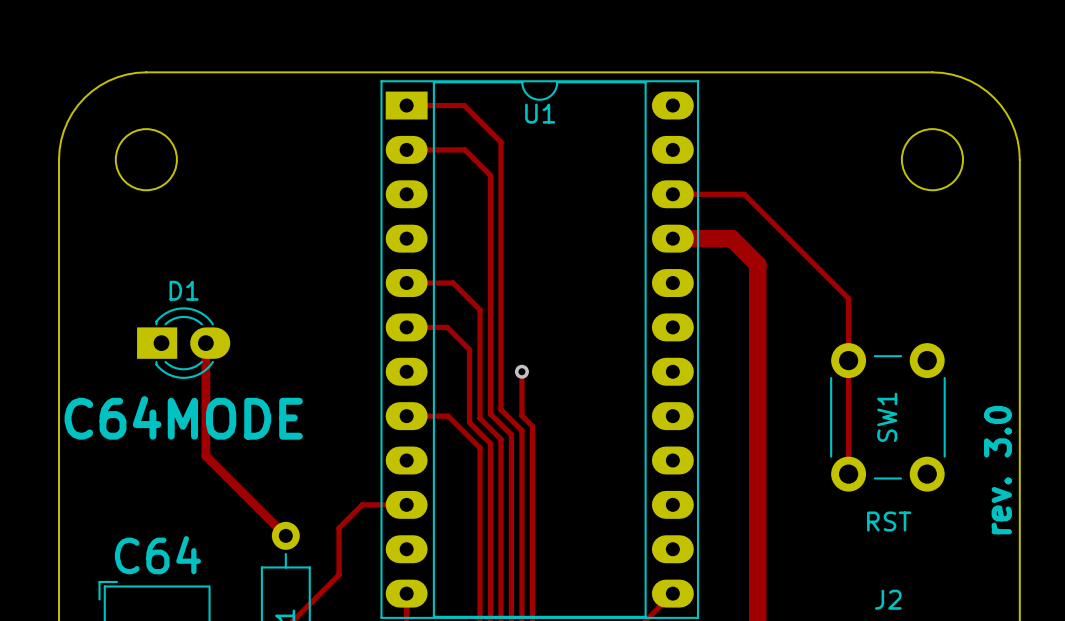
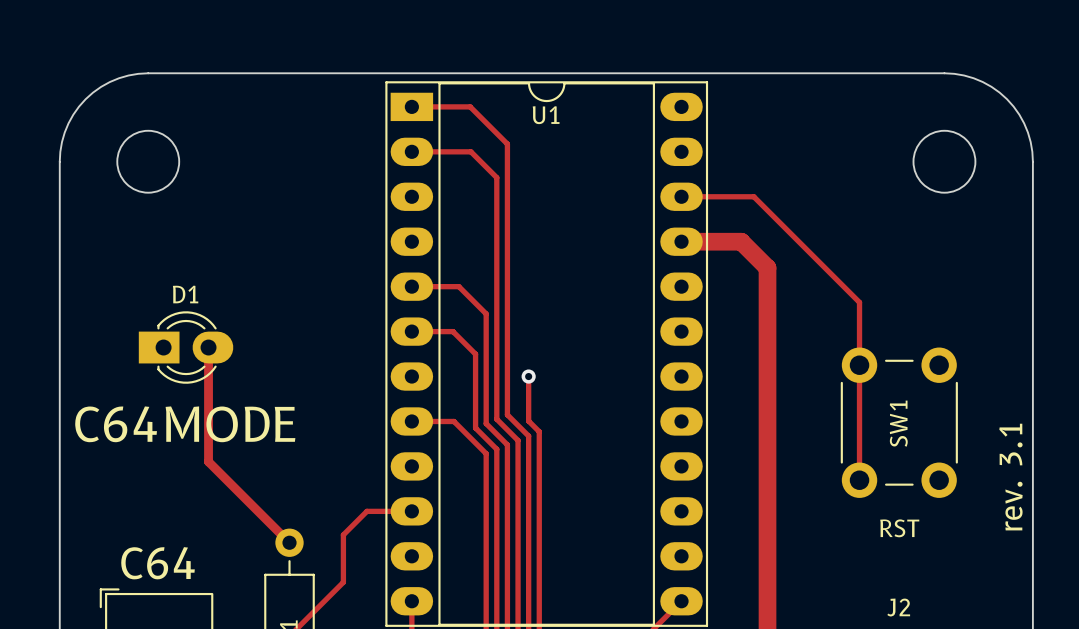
text: rev. 3.0 (997, 470) -> rev. 3.1 (1010, 477)

